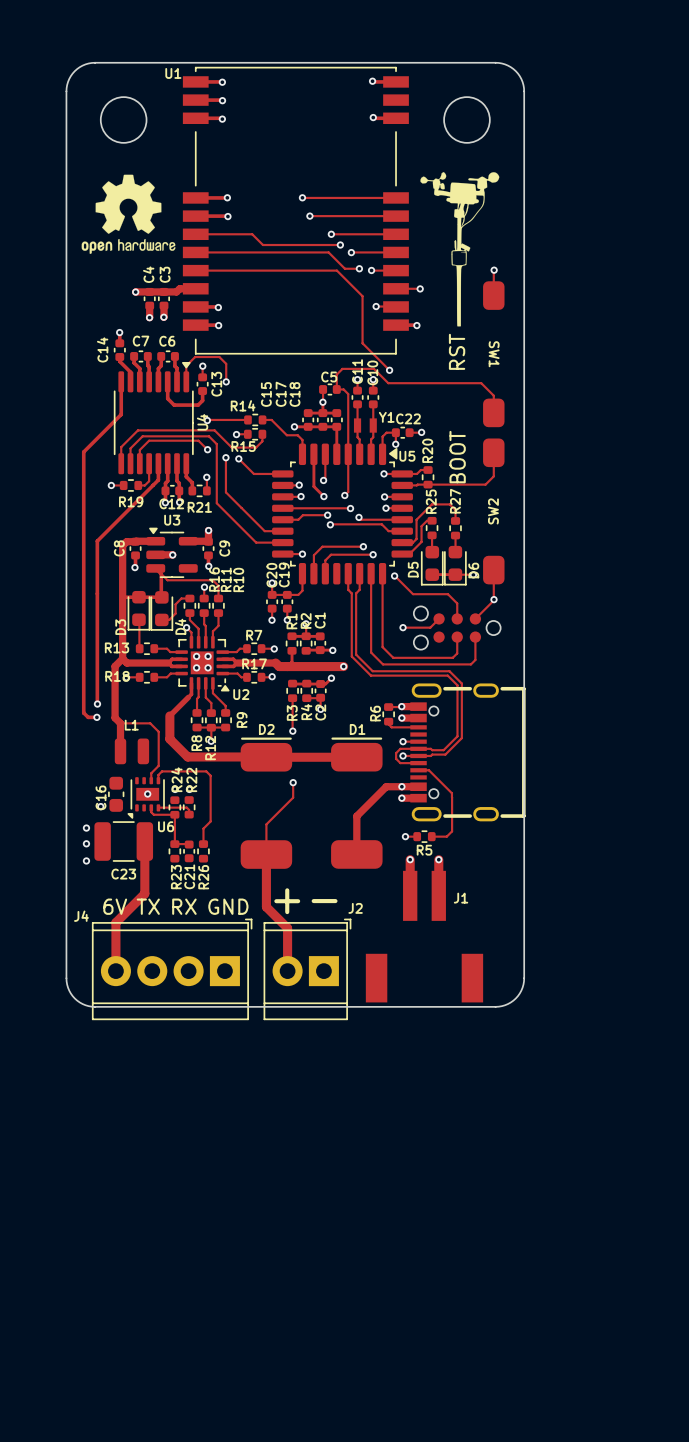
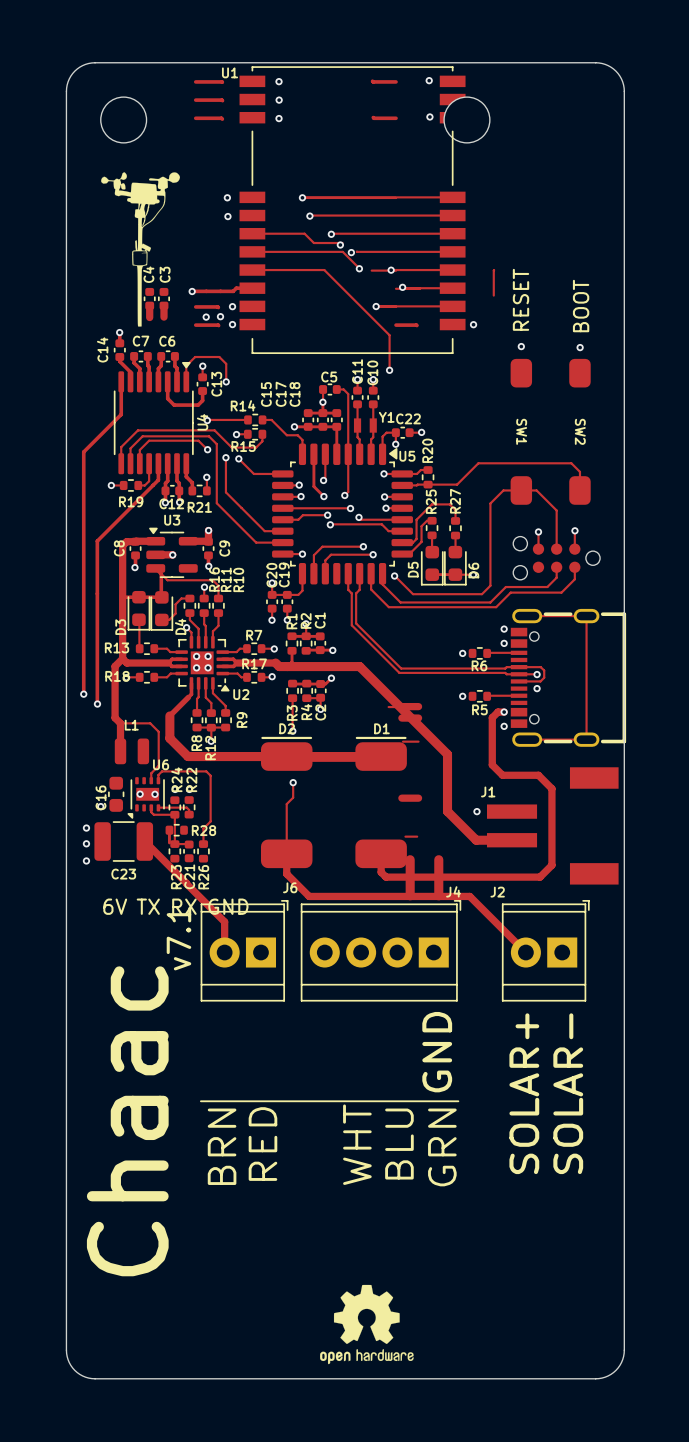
board edge: (495, 62) (507, 65) (515, 71) (521, 78) (524, 91) (524, 978) (521, 990) (510, 1002) (495, 1006) (95, 1006) (82, 1004) (74, 998) (68, 987) (66, 978) -> (495, 62) (602, 63) (610, 67) (618, 73) (624, 88) (624, 1350) (619, 1365) (610, 1374) (595, 1378) (95, 1378) (79, 1374) (69, 1362) (66, 1350) (66, 978)
via: none -> (429, 80)
via: none -> (279, 81)
via: (372, 81) -> none
via: (222, 82) -> none
via: (222, 100) -> none
via: none -> (279, 100)
via: none -> (429, 116)
via: (373, 117) -> none
via: none -> (279, 118)
via: (222, 119) -> none
drawing: [81, 174, 176, 254] -> none
track: (195, 197) (227, 197) -> none
track: none -> (302, 197) (452, 197)
U1 position: (295, 210) -> (352, 210)
track: (195, 216) (227, 216) -> none
track: (309, 216) (396, 216) -> (309, 215) (452, 215)
track: none -> (252, 233) (304, 233) (313, 243) (342, 243)
track: (195, 234) (252, 234) (262, 245) (340, 245) -> none
track: (331, 234) (396, 234) -> (331, 234) (452, 233)
drawing position: (459, 249) -> (140, 249)
track: none -> (356, 251) (452, 251)
track: (195, 252) (328, 252) (344, 268) (359, 268) -> (252, 251) (342, 251) (359, 268)
track: (351, 252) (396, 252) -> none
track: (195, 270) (336, 270) (362, 296) (362, 343) (389, 370) -> (252, 270) (324, 270) (389, 335) (389, 370)
via: (371, 270) -> none
track: none -> (391, 270) (452, 270)
via: none -> (391, 270)
via: (494, 270) -> none
track: none -> (402, 287) (452, 288)
via: none -> (402, 287)
track: (195, 288) (179, 288) (176, 291) (135, 291) -> (252, 288) (236, 288) (233, 291) (192, 291)
via: (420, 288) -> none
via: none -> (192, 291)
via: (135, 292) -> none
text: none -> RESET (521, 299)
track: none -> (378, 305) (452, 305)
via: none -> (232, 306)
via: (218, 307) -> none
via: none -> (220, 316)
via: (149, 317) -> none
via: (163, 317) -> none
via: none -> (206, 317)
via: none -> (232, 324)
via: none -> (473, 324)
via: (218, 325) -> none
via: (416, 325) -> none
via: none -> (521, 346)
via: none -> (580, 347)
text: RST (457, 351) -> none
SW1 position: (493, 354) -> (521, 431)
track: (336, 389) (336, 374) (342, 368) (373, 368) (388, 383) (481, 383) (493, 395) (493, 412) -> none
track: (493, 452) (493, 476) (485, 484) (457, 484) -> (579, 490) (579, 471) (571, 463) (478, 463) (457, 484)
text position: BOOT (457, 457) -> BOOT (581, 306)
SW2 position: (493, 511) -> (579, 431)
SW2 name rotation: 0° (493, 511) -> 180° (580, 431)
track: none -> (574, 530) (574, 549)
via: none -> (574, 530)
track: none -> (538, 531) (538, 549)
via: none -> (538, 531)
track: (493, 570) (494, 600) (475, 618) -> none
track: (382, 584) (382, 647) (393, 657) (452, 657) (457, 653) (457, 637) -> (382, 584) (400, 602) (490, 602) (505, 587) (547, 587) (556, 577) (556, 567)
track: (371, 589) (371, 652) (383, 664) (470, 664) (475, 659) (475, 637) -> (371, 589) (388, 607) (496, 607) (510, 592) (561, 592) (574, 579) (574, 567)
track: (447, 594) (457, 603) (457, 618) -> (447, 594) (481, 594) (490, 585) (490, 503) (503, 490) (536, 490) (556, 510) (556, 549)
via: (494, 599) -> none
track: none -> (527, 616) (586, 616) (586, 739) (527, 739)
track: (439, 618) (430, 627) (403, 627) -> none
track: (356, 623) (356, 654) (372, 671) (449, 671) (461, 683) (461, 738) (445, 754) (403, 755) -> (356, 623) (401, 668) (540, 667) (544, 670) (544, 677) (540, 681) (519, 681)
track: (351, 625) (351, 656) (370, 675) (447, 675) (457, 685) (457, 736) (443, 750) (400, 748) (396, 753) (396, 758) (400, 763) (418, 763) -> (351, 625) (399, 672) (537, 674)
via: (403, 627) -> none
part position: (457, 628) -> (556, 558)
via: none -> (504, 629)
via: none -> (504, 643)
track: none -> (519, 652) (487, 653)
via: none -> (462, 653)
track: none -> (343, 666) (359, 666) (447, 754) (447, 811) (476, 840) (512, 840)
via: (343, 666) -> none
via: none -> (537, 674)
via: none -> (537, 688)
track: (83, 694) (83, 712) (88, 717) (96, 717) -> none
track: none -> (519, 695) (487, 696)
via: none -> (462, 696)
via: (401, 706) -> none
track: none -> (504, 712) (498, 712) (492, 717) (492, 764) (502, 775) (538, 775) (551, 788) (551, 865) (540, 877) (386, 877) (381, 872) (381, 853)
via: none -> (504, 712)
R6 rotation: 0° (388, 714) -> 90° clockwise (479, 653)
R6 position: (388, 714) -> (479, 653)
via position: (96, 717) -> (83, 694)
via: (401, 718) -> none
track: (388, 721) (391, 727) (418, 727) -> none
via: none -> (504, 726)
track: (169, 738) (187, 756) (266, 756) -> (169, 738) (188, 756) (381, 756)
via: (403, 741) -> none
part position: (467, 752) -> (568, 677)
via: (403, 755) -> none
track: (418, 770) (428, 770) (451, 793) (451, 797) -> none
via: (401, 786) -> none
track: (418, 786) (386, 786) (356, 816) (356, 854) -> none
via: none -> (140, 794)
via: (147, 794) -> none
via: none -> (154, 794)
track: (452, 797) (452, 831) (446, 836) (431, 836) -> none
via: (401, 798) -> none
D2 position: (266, 803) -> (286, 802)
D1 position: (356, 803) -> (381, 802)
track: (286, 804) (266, 824) (266, 907) (287, 928) (287, 971) -> (286, 804) (286, 854)
via: none -> (476, 811)
U6 name position: U6 (166, 826) -> U6 (161, 764)
track: none -> (169, 830) (169, 842)
R28: none -> (176, 830)
via: (405, 836) -> none
R5 position: (424, 836) -> (479, 696)
track: (144, 841) (144, 893) (115, 922) (115, 971) -> (144, 841) (224, 921) (224, 952)
track: none -> (286, 853) (286, 873) (309, 896) (469, 896) (525, 952)
via: (410, 859) -> none
via: (438, 859) -> none
text: + (287, 901) -> none
text: - (324, 901) -> none
J2 name position: J2 (355, 908) -> J2 (497, 892)
J4 name position: J4 (81, 916) -> J4 (453, 891)
J1 rotation: 0° (424, 936) -> 90° counterclockwise (552, 825)
J1 position: (424, 936) -> (552, 825)
text: none -> v7.1 (178, 938)
J6: none -> (244, 950)
J4 position: (172, 969) -> (380, 950)
J2 position: (307, 969) -> (545, 950)
text: none -> GND (437, 1052)
text: none -> SOLAR+ (524, 1093)
text: none -> SOLAR- (568, 1093)
line: none -> (200, 1101) (458, 1101)
text: none -> Chaac (127, 1121)
text: none -> RED (262, 1144)
text: none -> WHT (357, 1144)
text: none -> BLU (399, 1144)
text: none -> BRN (222, 1146)
text: none -> GRN (442, 1147)
drawing: none -> [320, 1284, 414, 1365]

